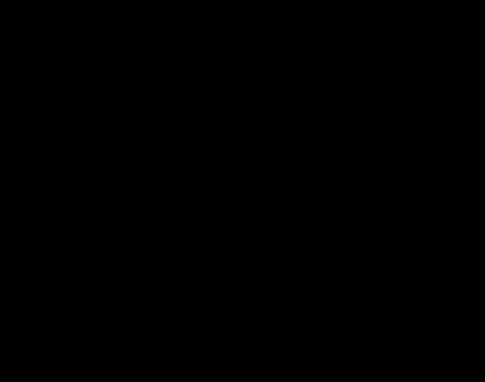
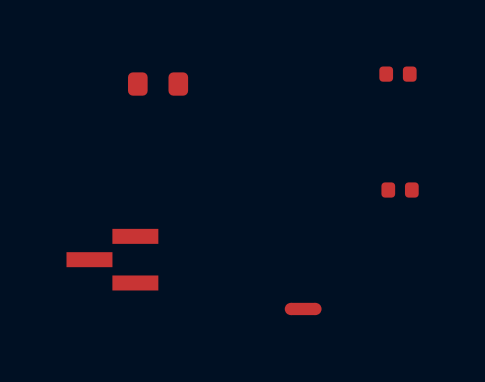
part: none -> (397, 74)
part: none -> (158, 84)
part: none -> (400, 190)
part: none -> (112, 259)
part: none -> (303, 308)

